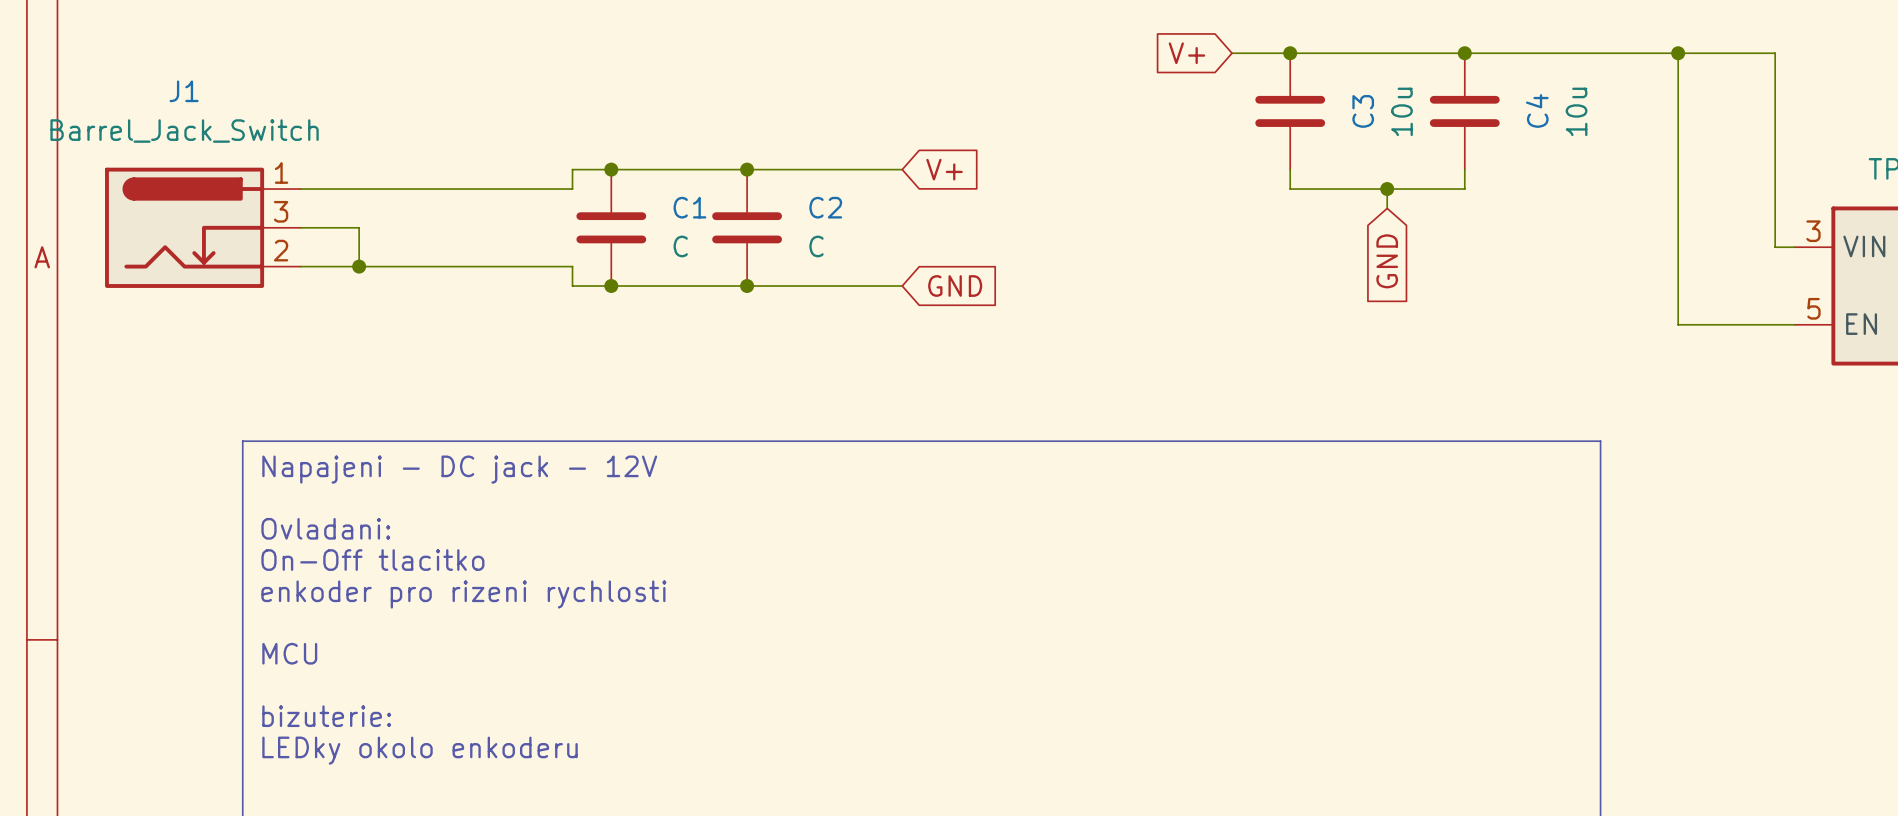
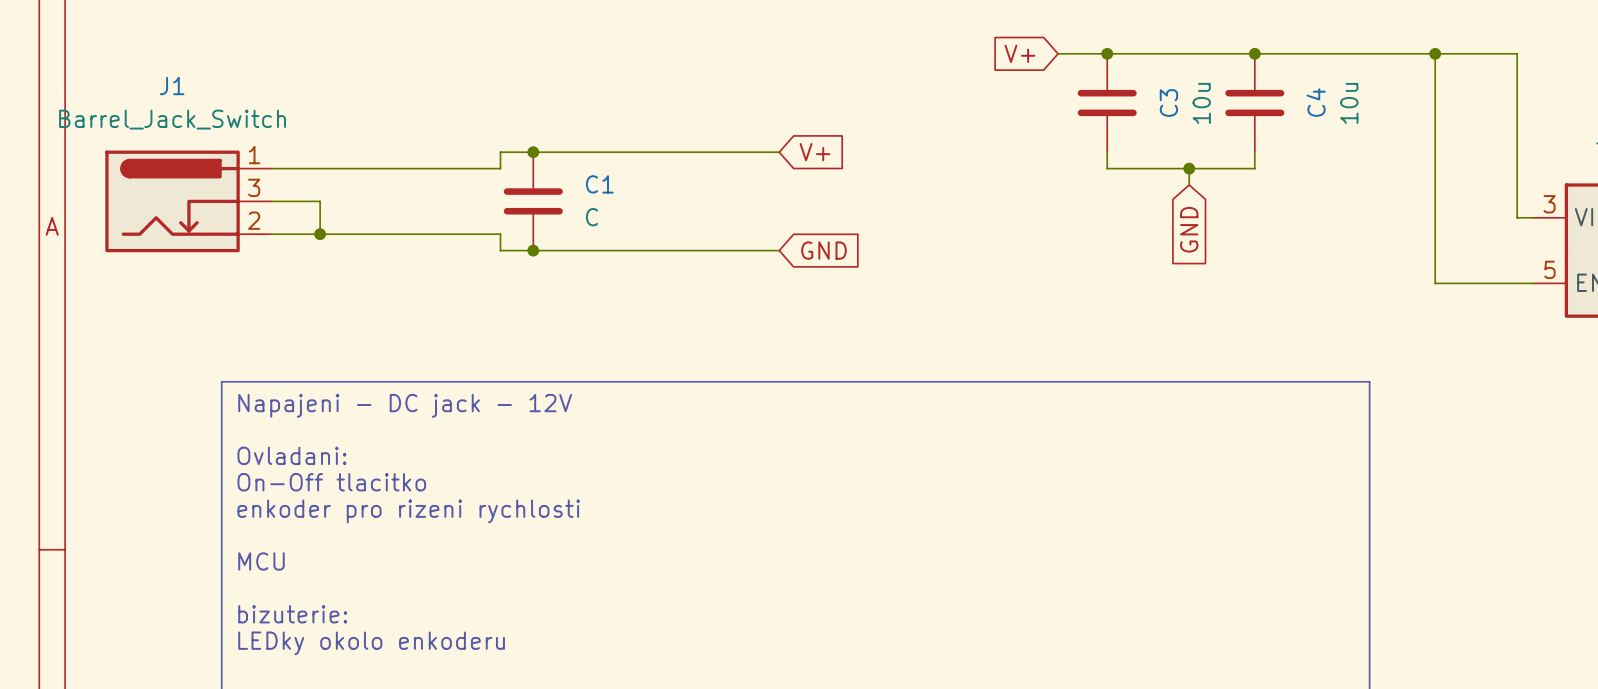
junction: (747, 169) -> none
C2: C (747, 227) -> none
junction: (747, 286) -> none

